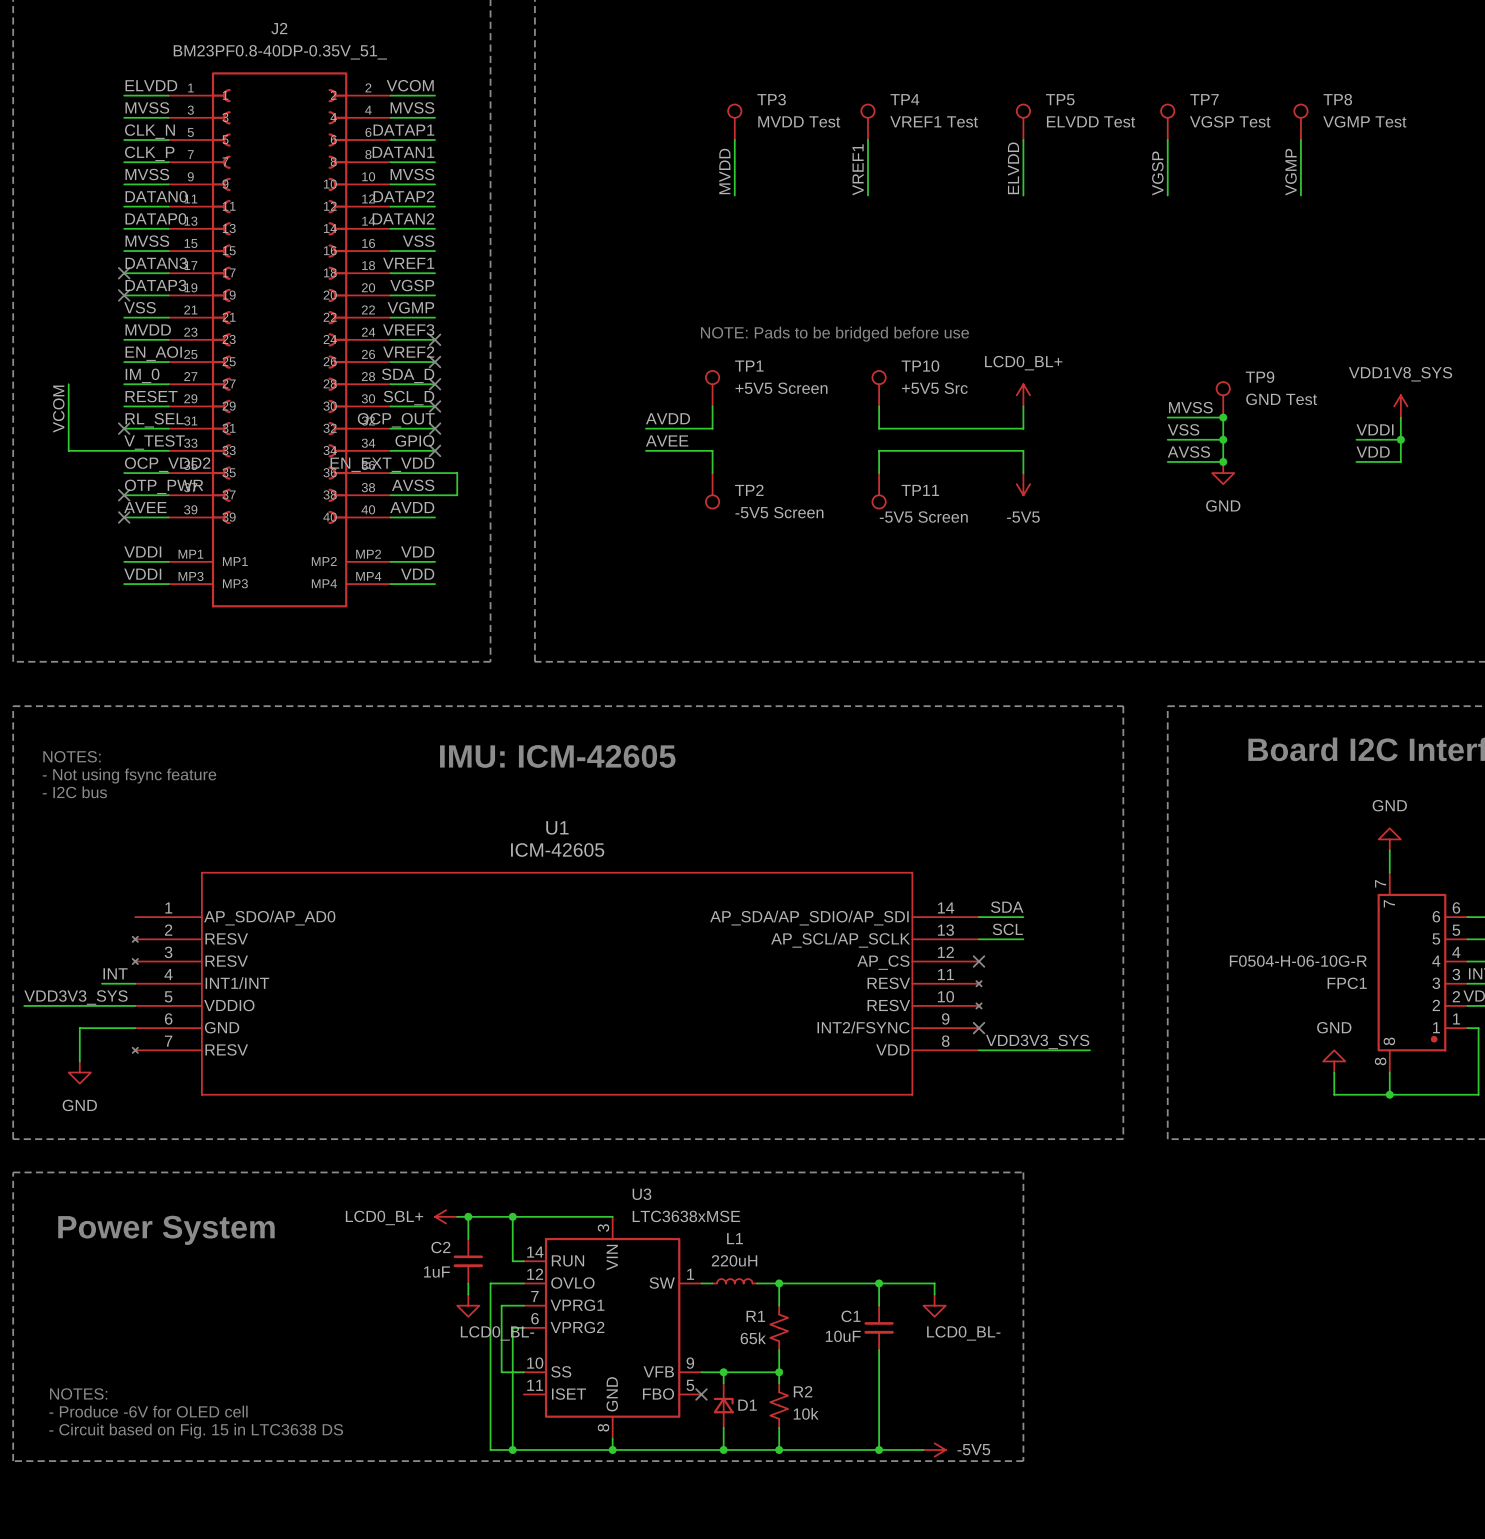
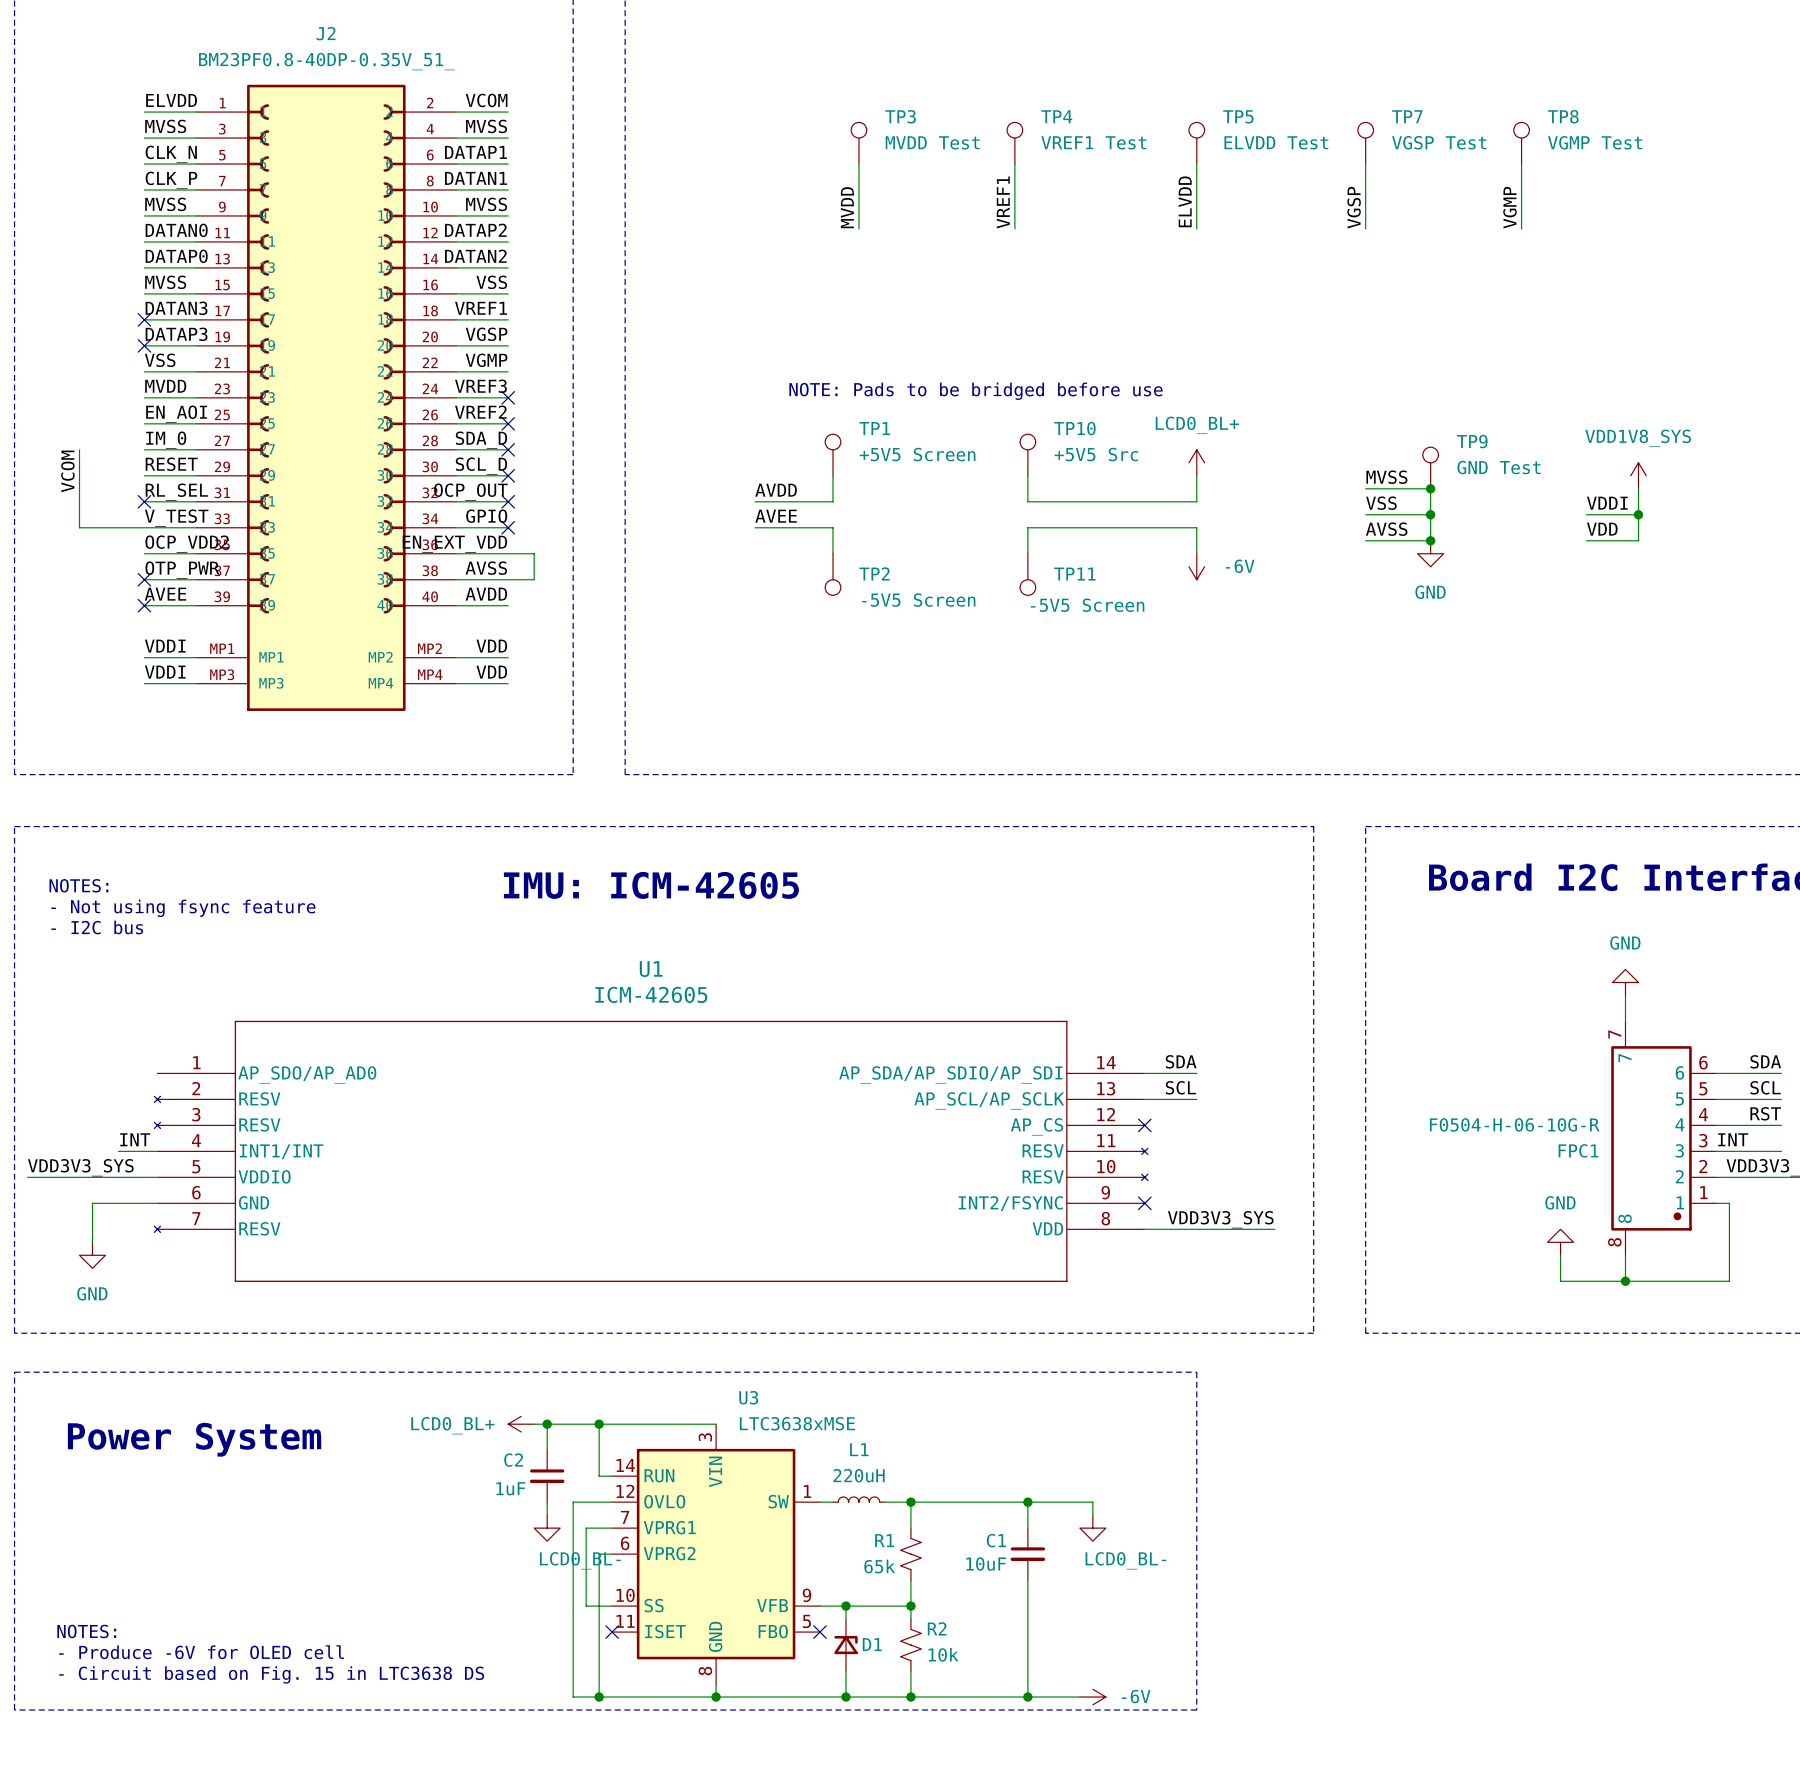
power symbol: -5V5 (1023, 484) -> -6V (1196, 566)
no-connect mark: none -> (612, 1632)
power symbol: -5V5 (934, 1449) -> -6V (1092, 1697)

